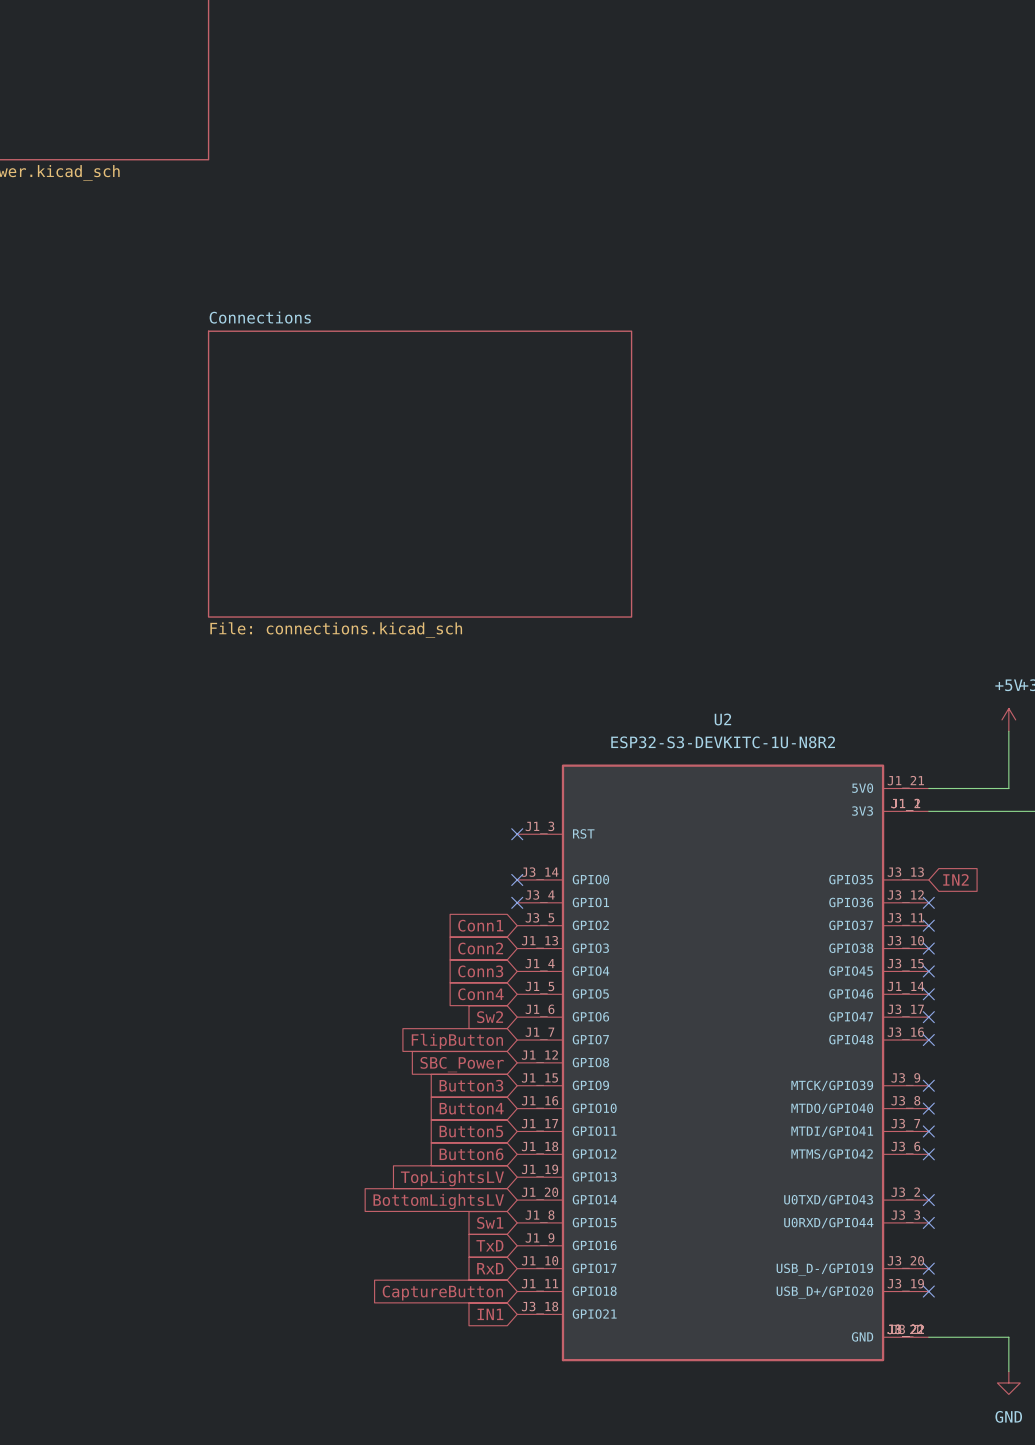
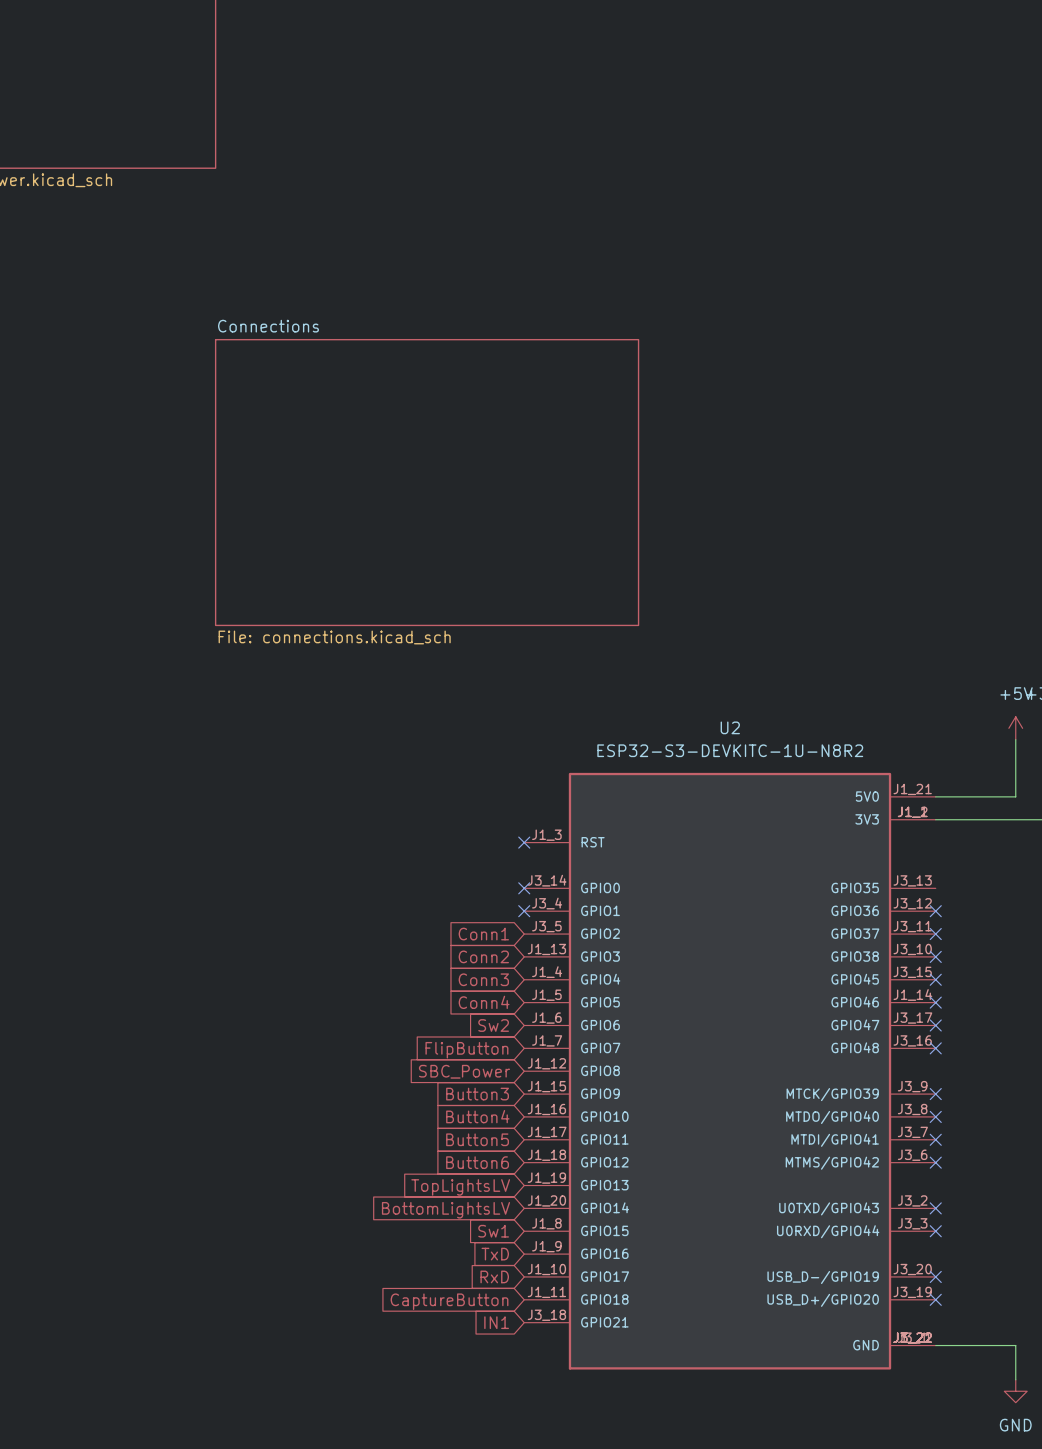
global label: IN2 (955, 879) -> none

